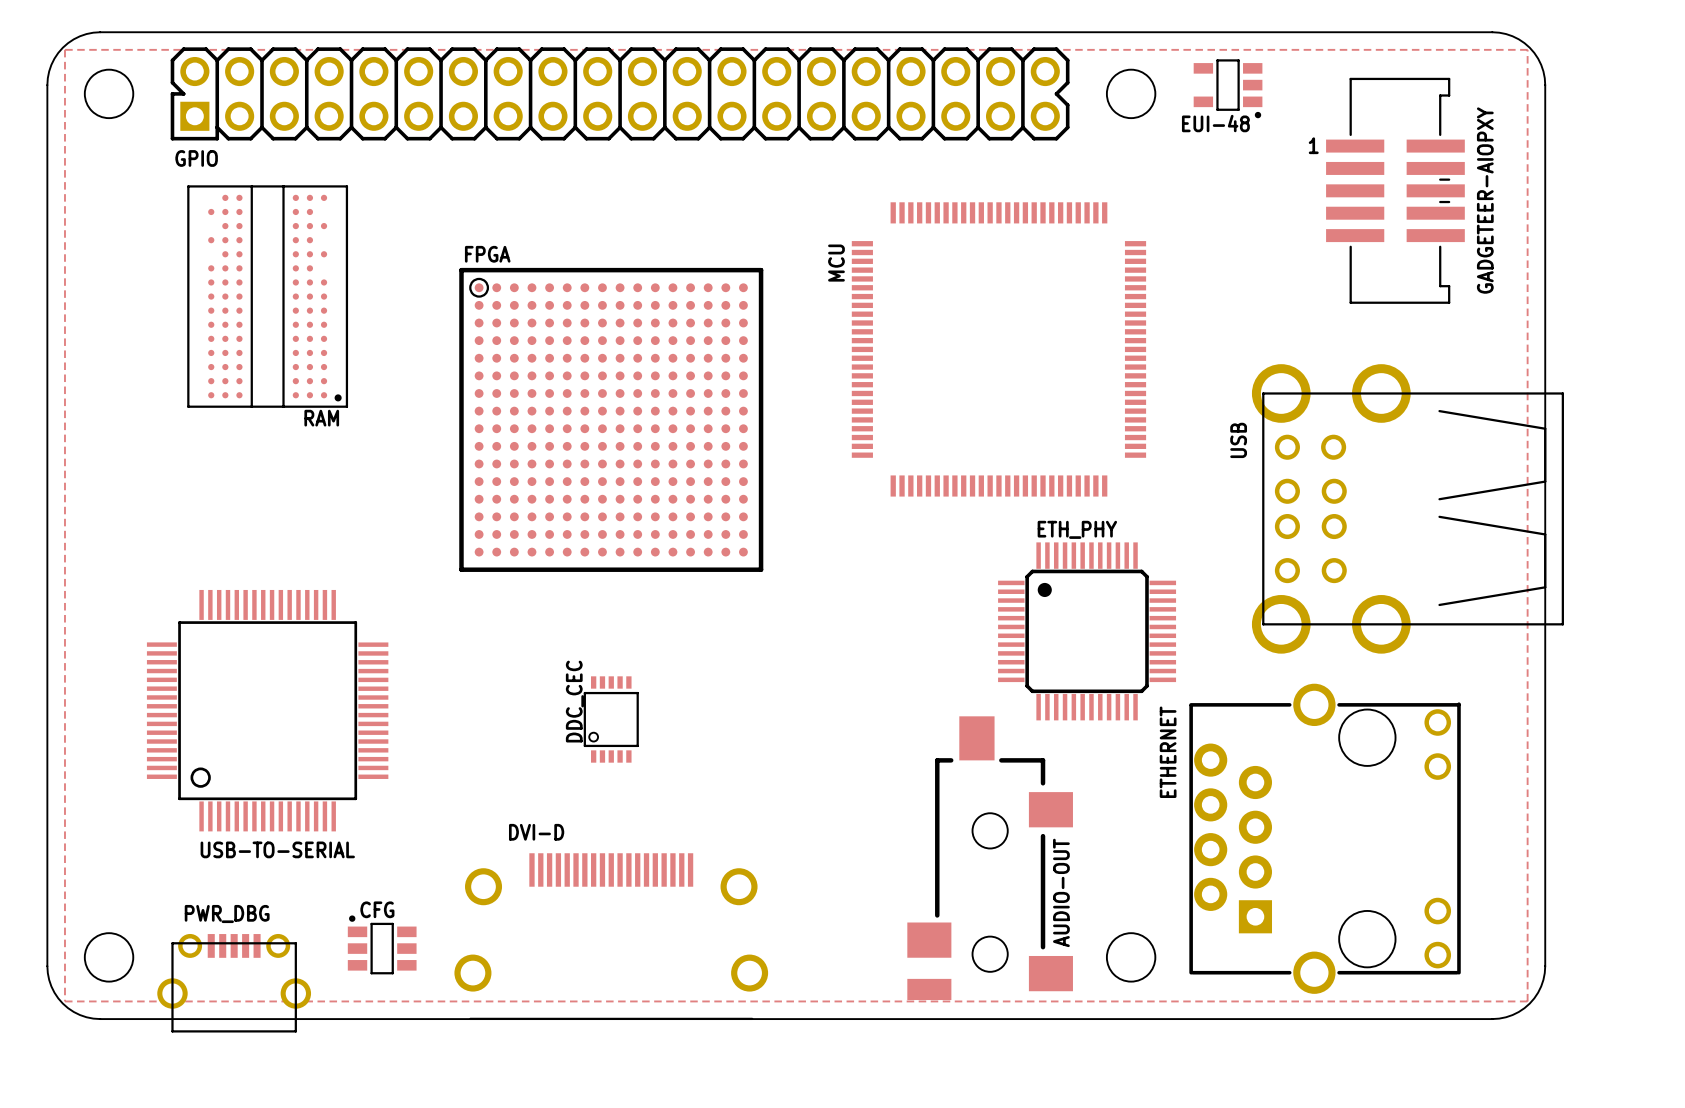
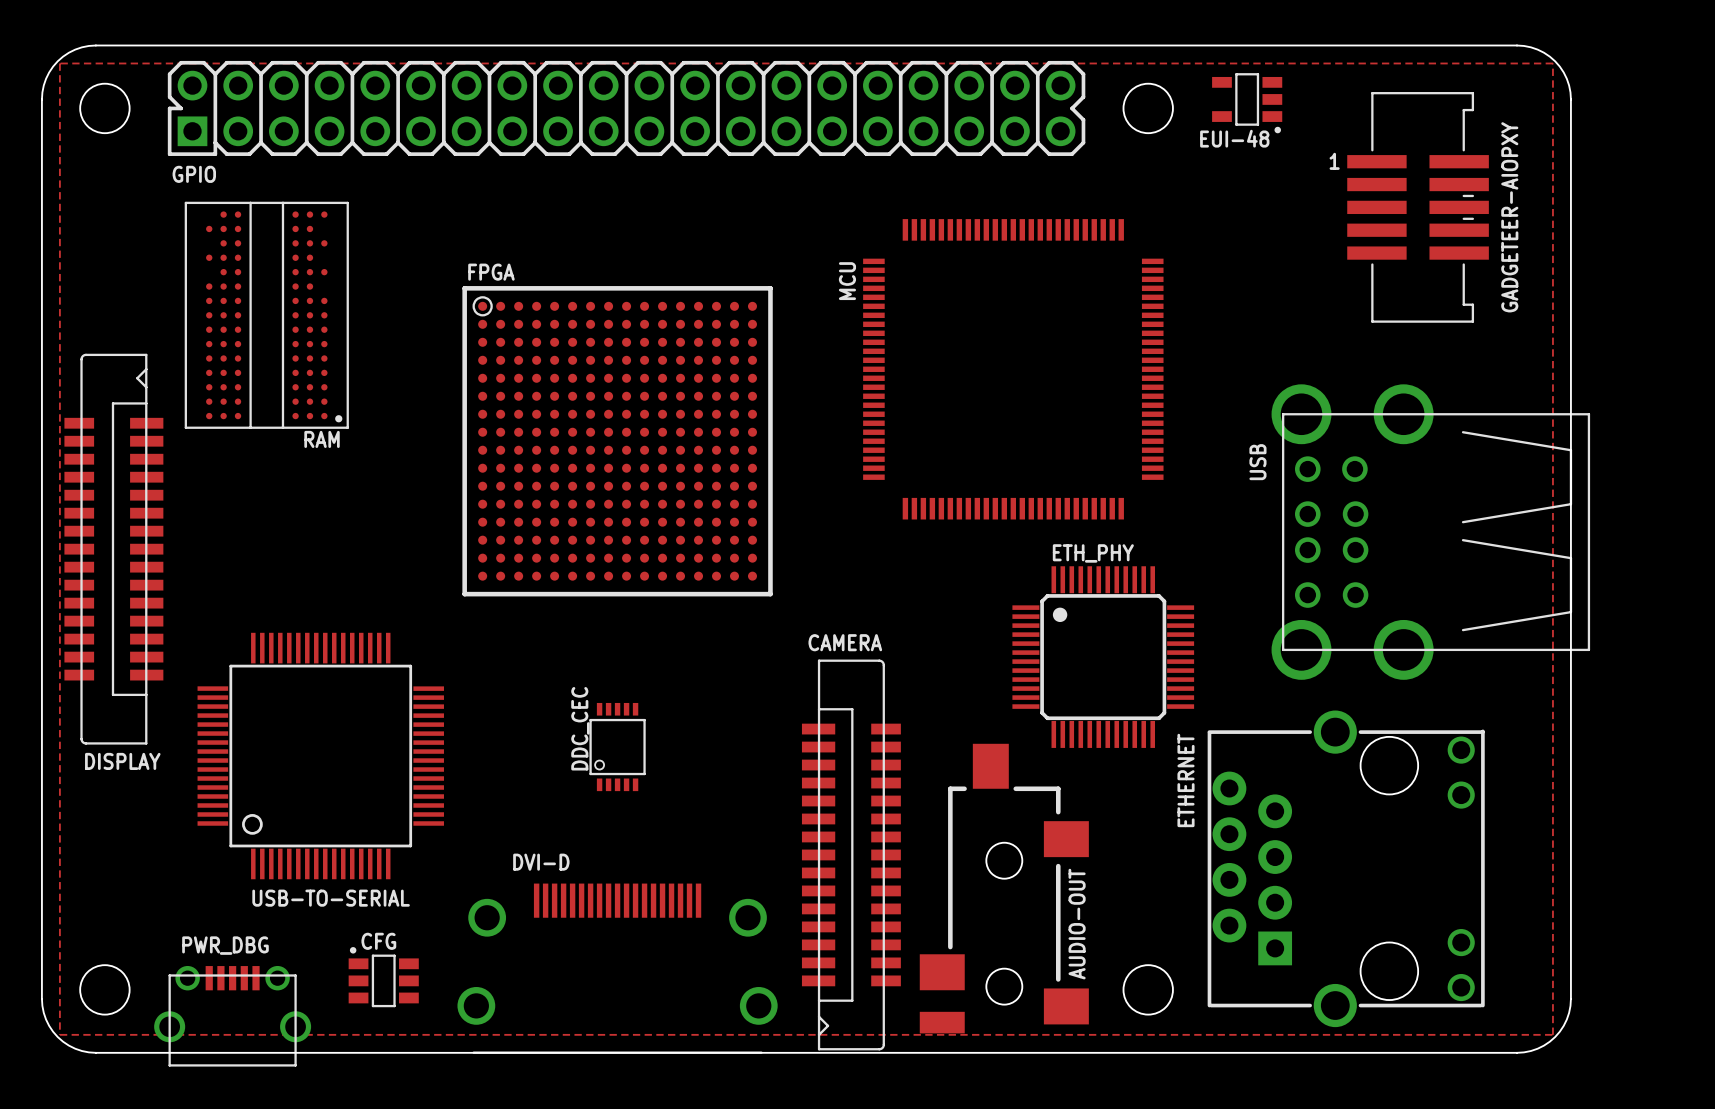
DISPLAY: none -> (113, 549)
USB-TO-SERIAL position: (267, 710) -> (320, 756)
CAMERA: none -> (851, 854)

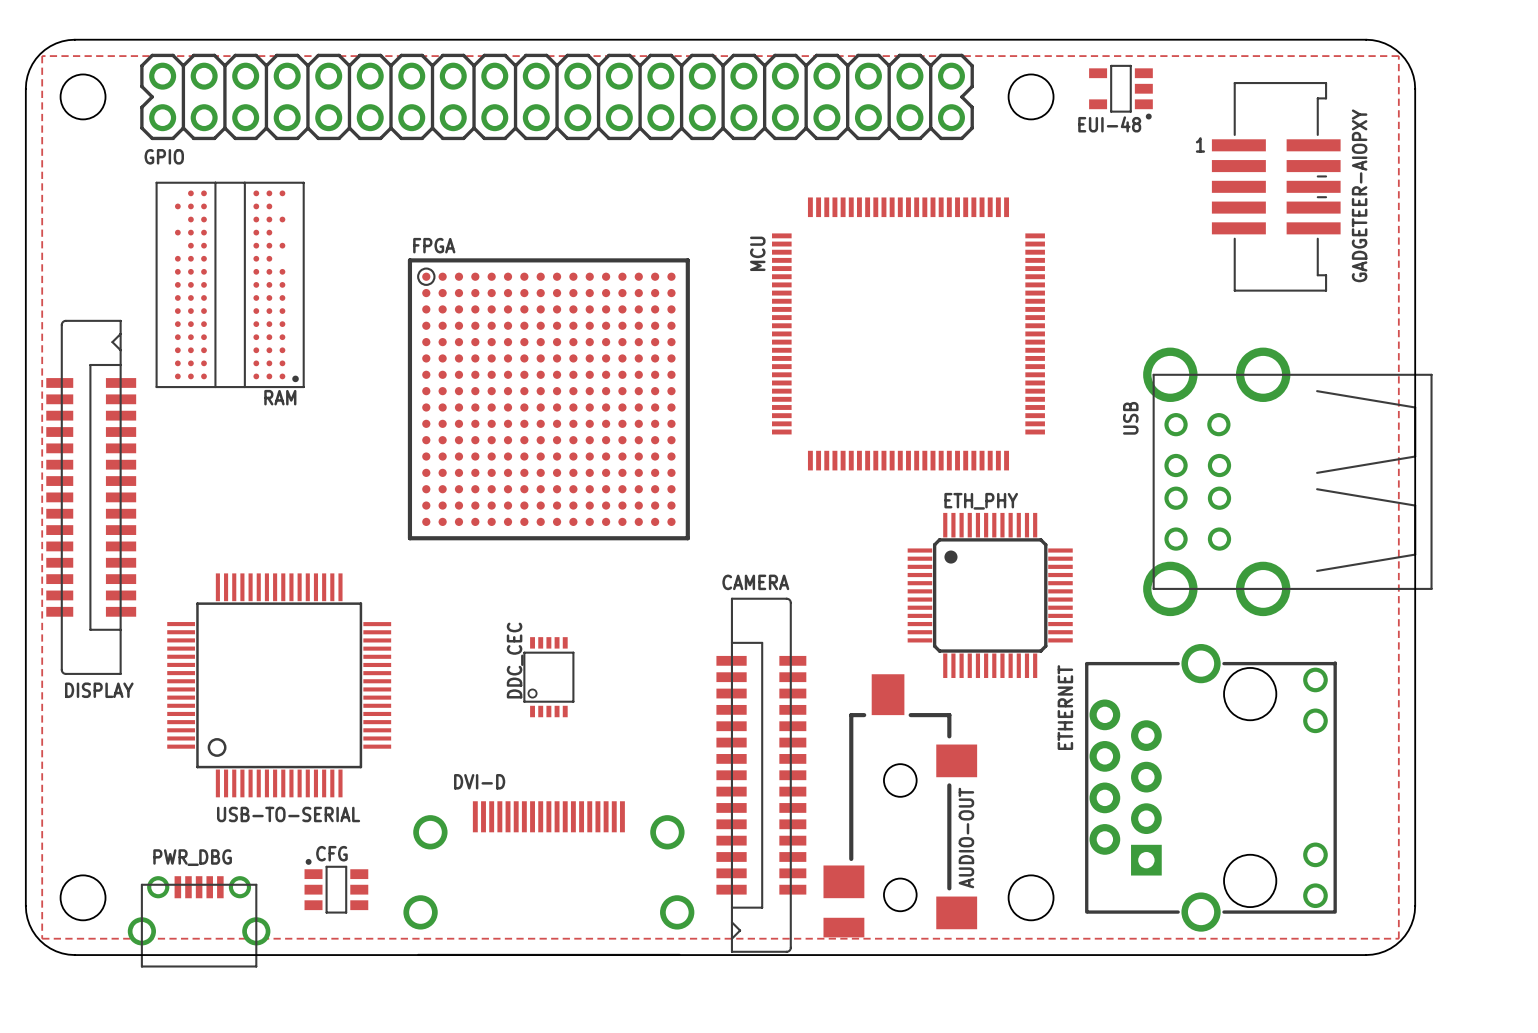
GPIO footprint: [167, 60, 1086, 156] -> [140, 53, 974, 141]

